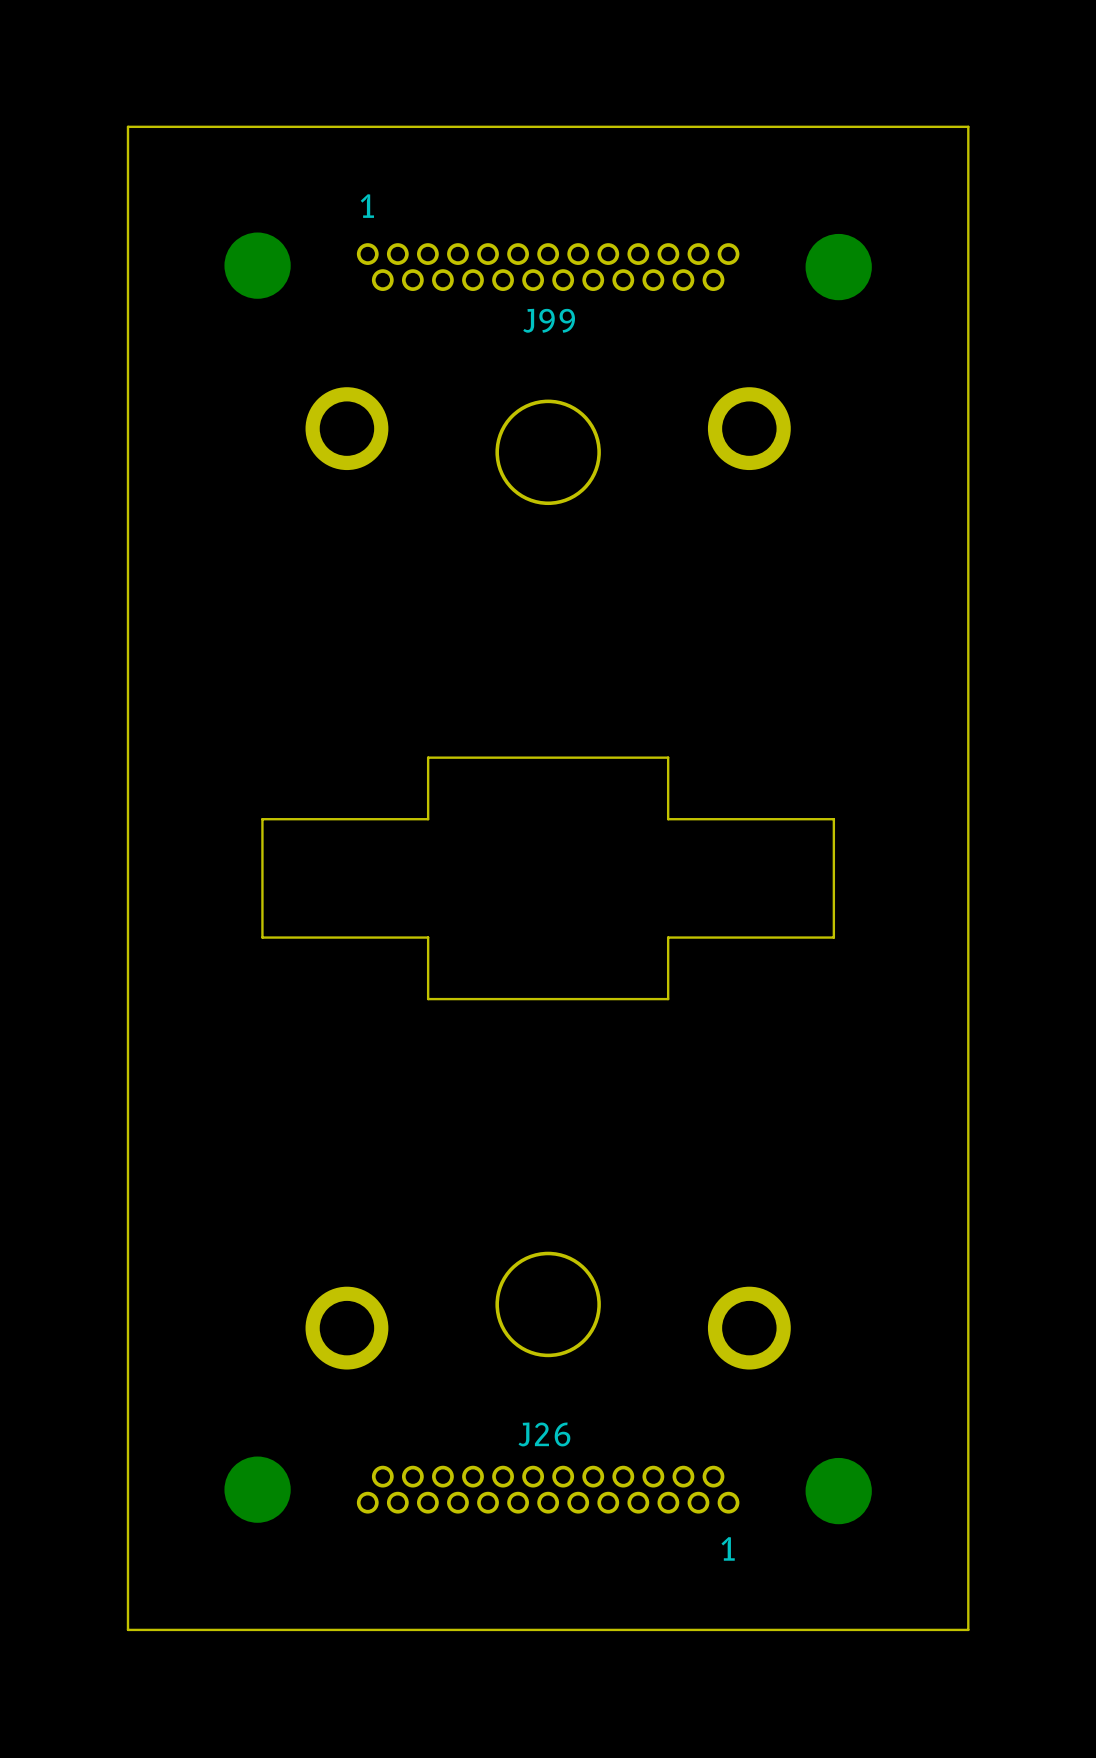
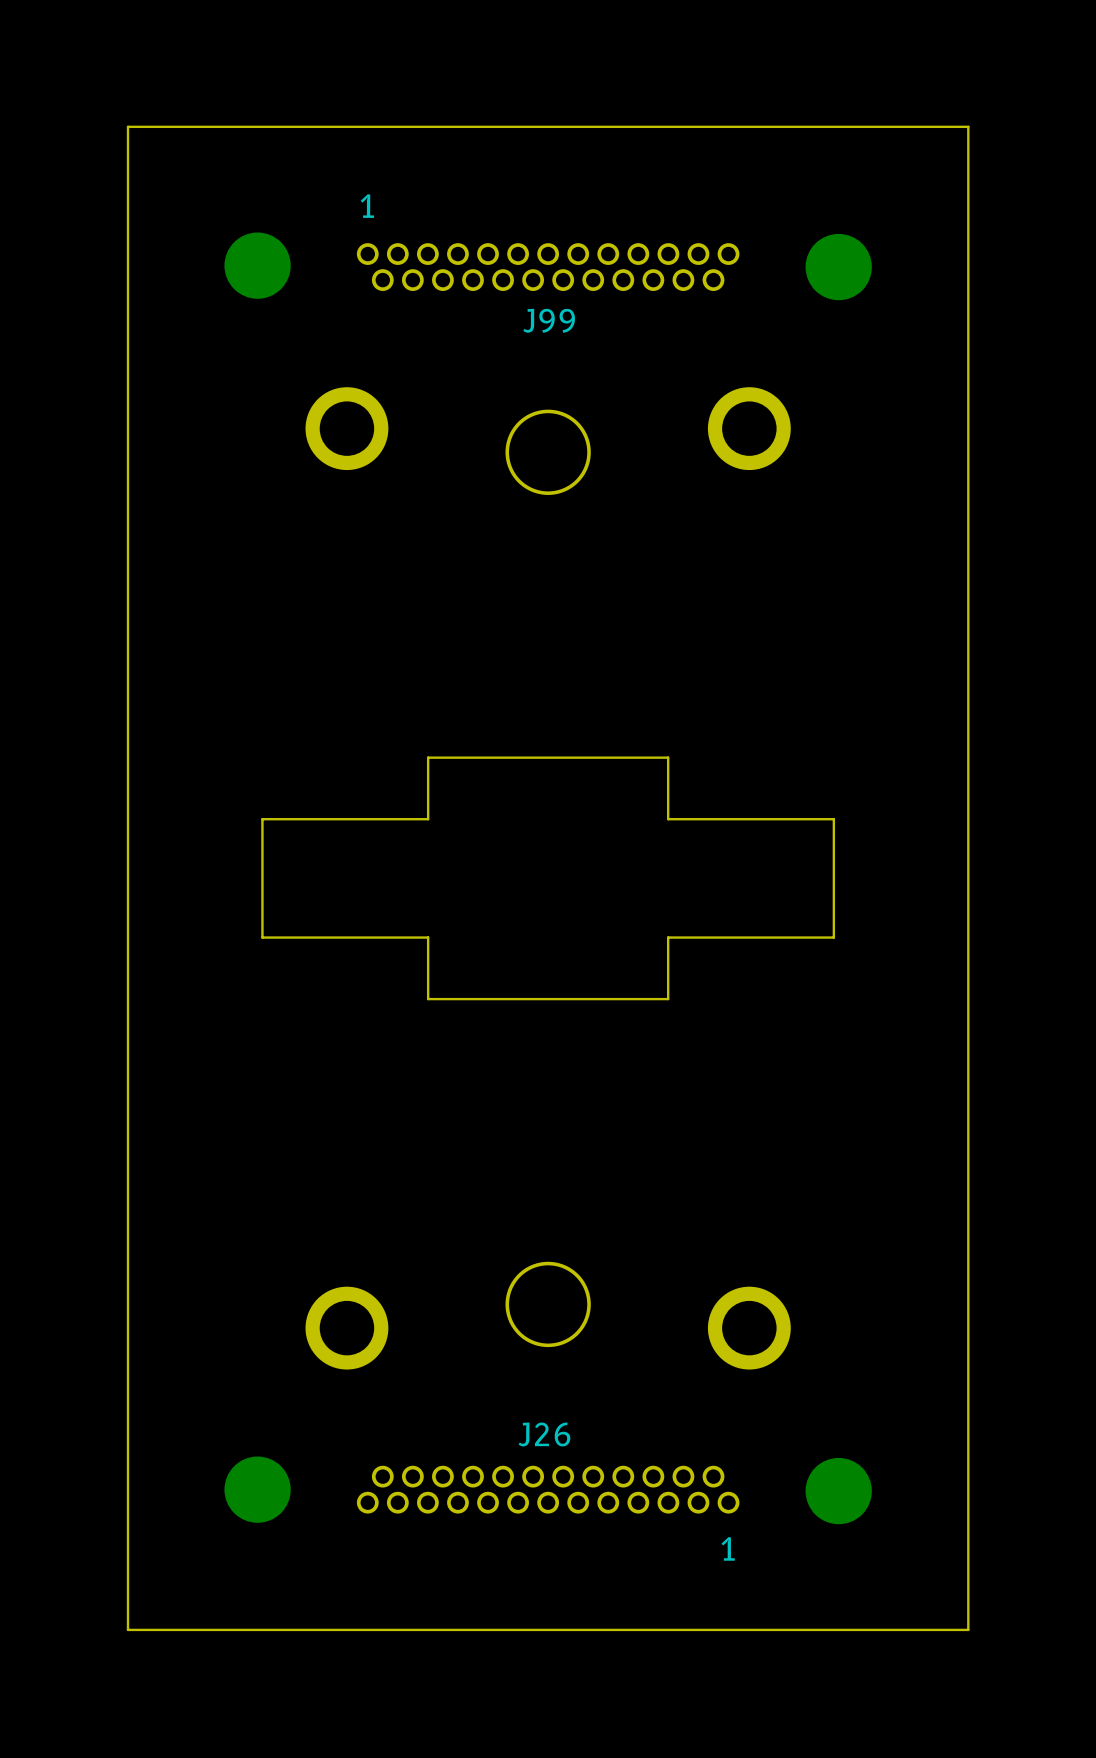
round board edge size: [495, 399, 601, 506] -> [505, 409, 591, 495]
round board edge size: [495, 1251, 601, 1358] -> [505, 1261, 591, 1348]

